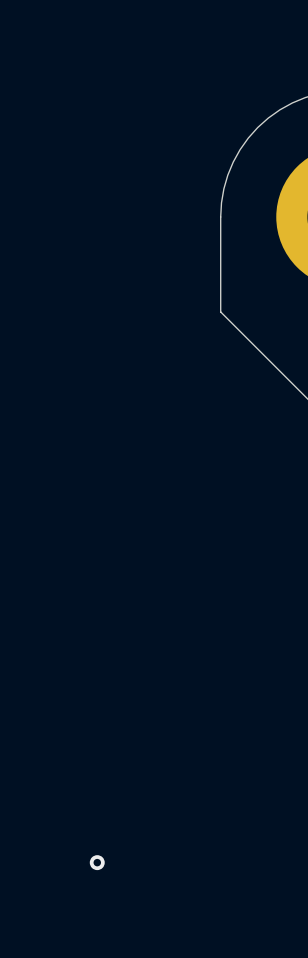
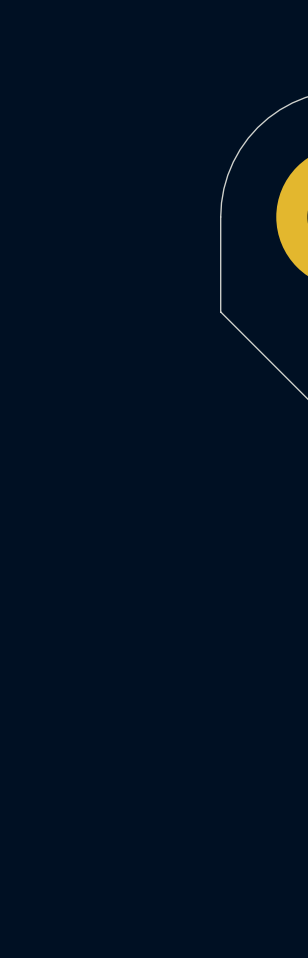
via: (97, 862) -> none

